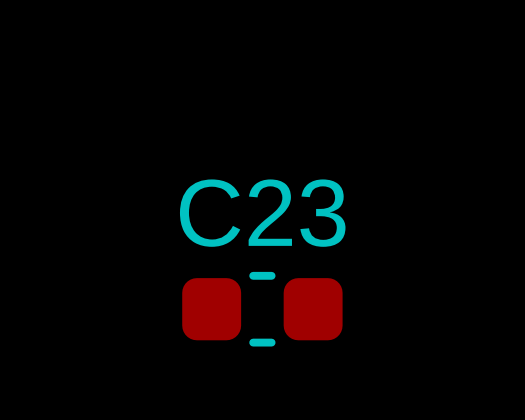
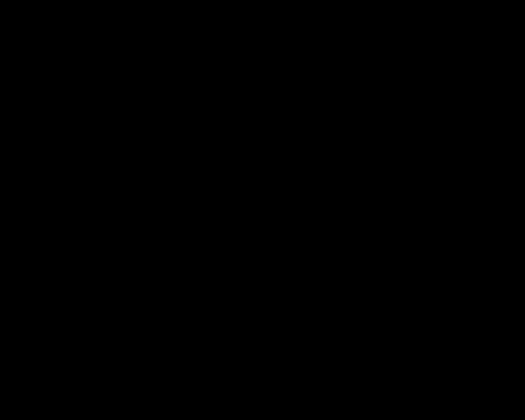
C23: (262, 309) -> none

